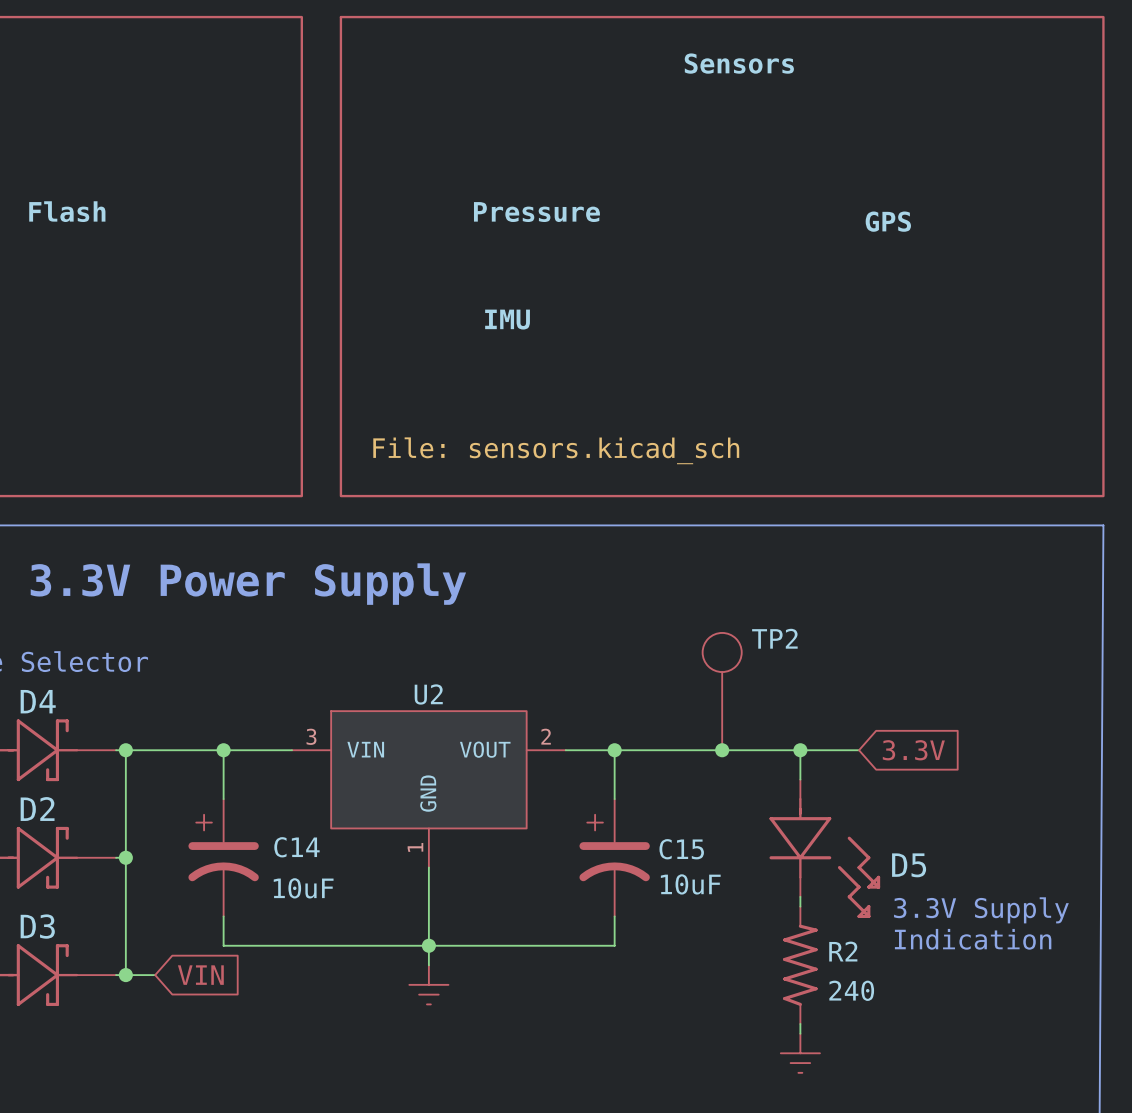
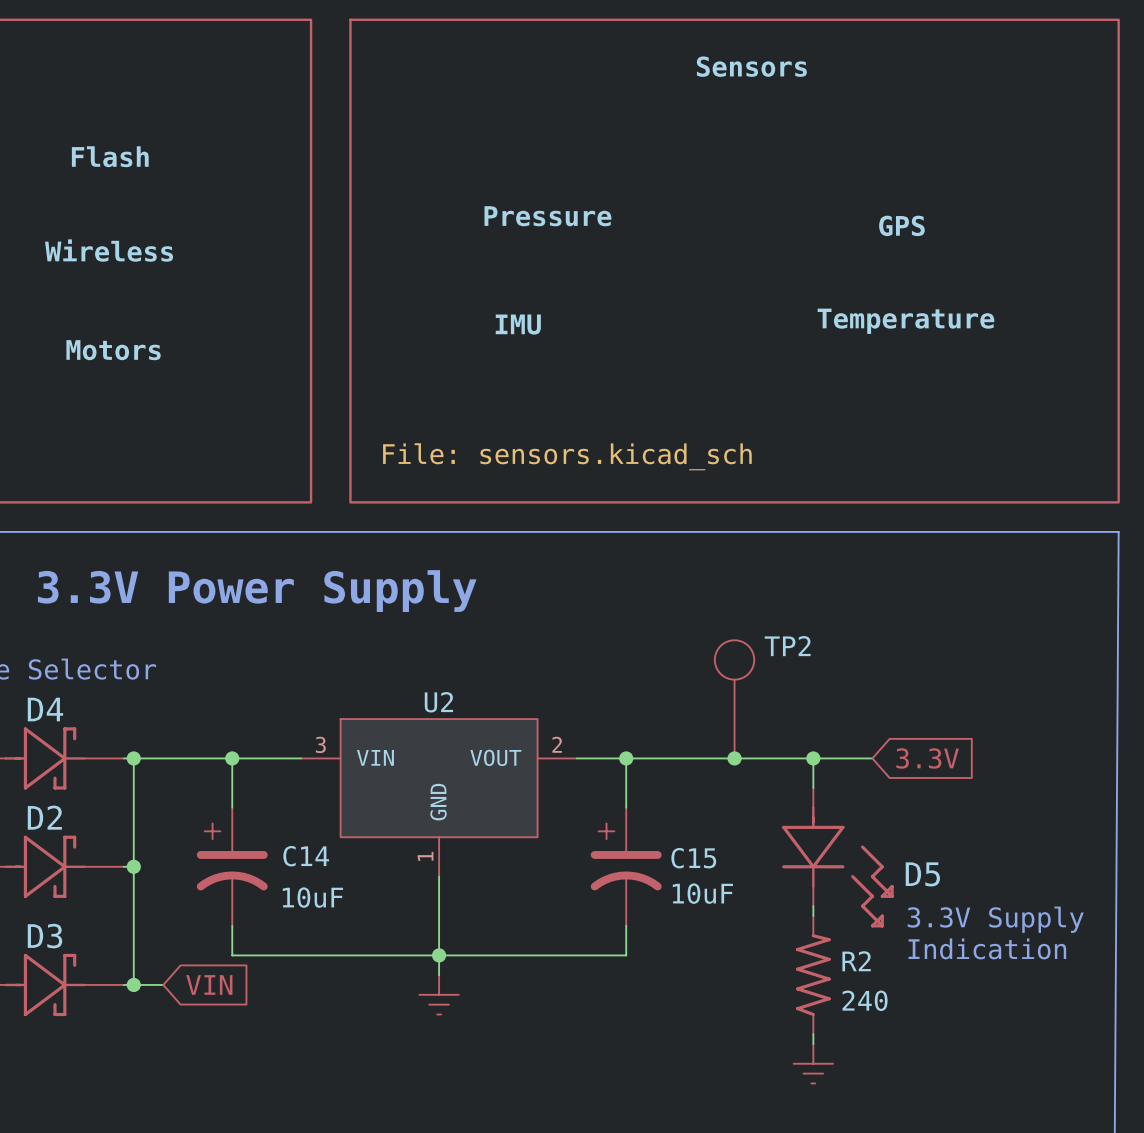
sheet text position: Flash (67, 211) -> Flash (110, 156)
sheet text: none -> Wireless (109, 250)
sheet Sensors text: none -> Temperature (905, 321)
sheet text: none -> Motors (113, 350)

